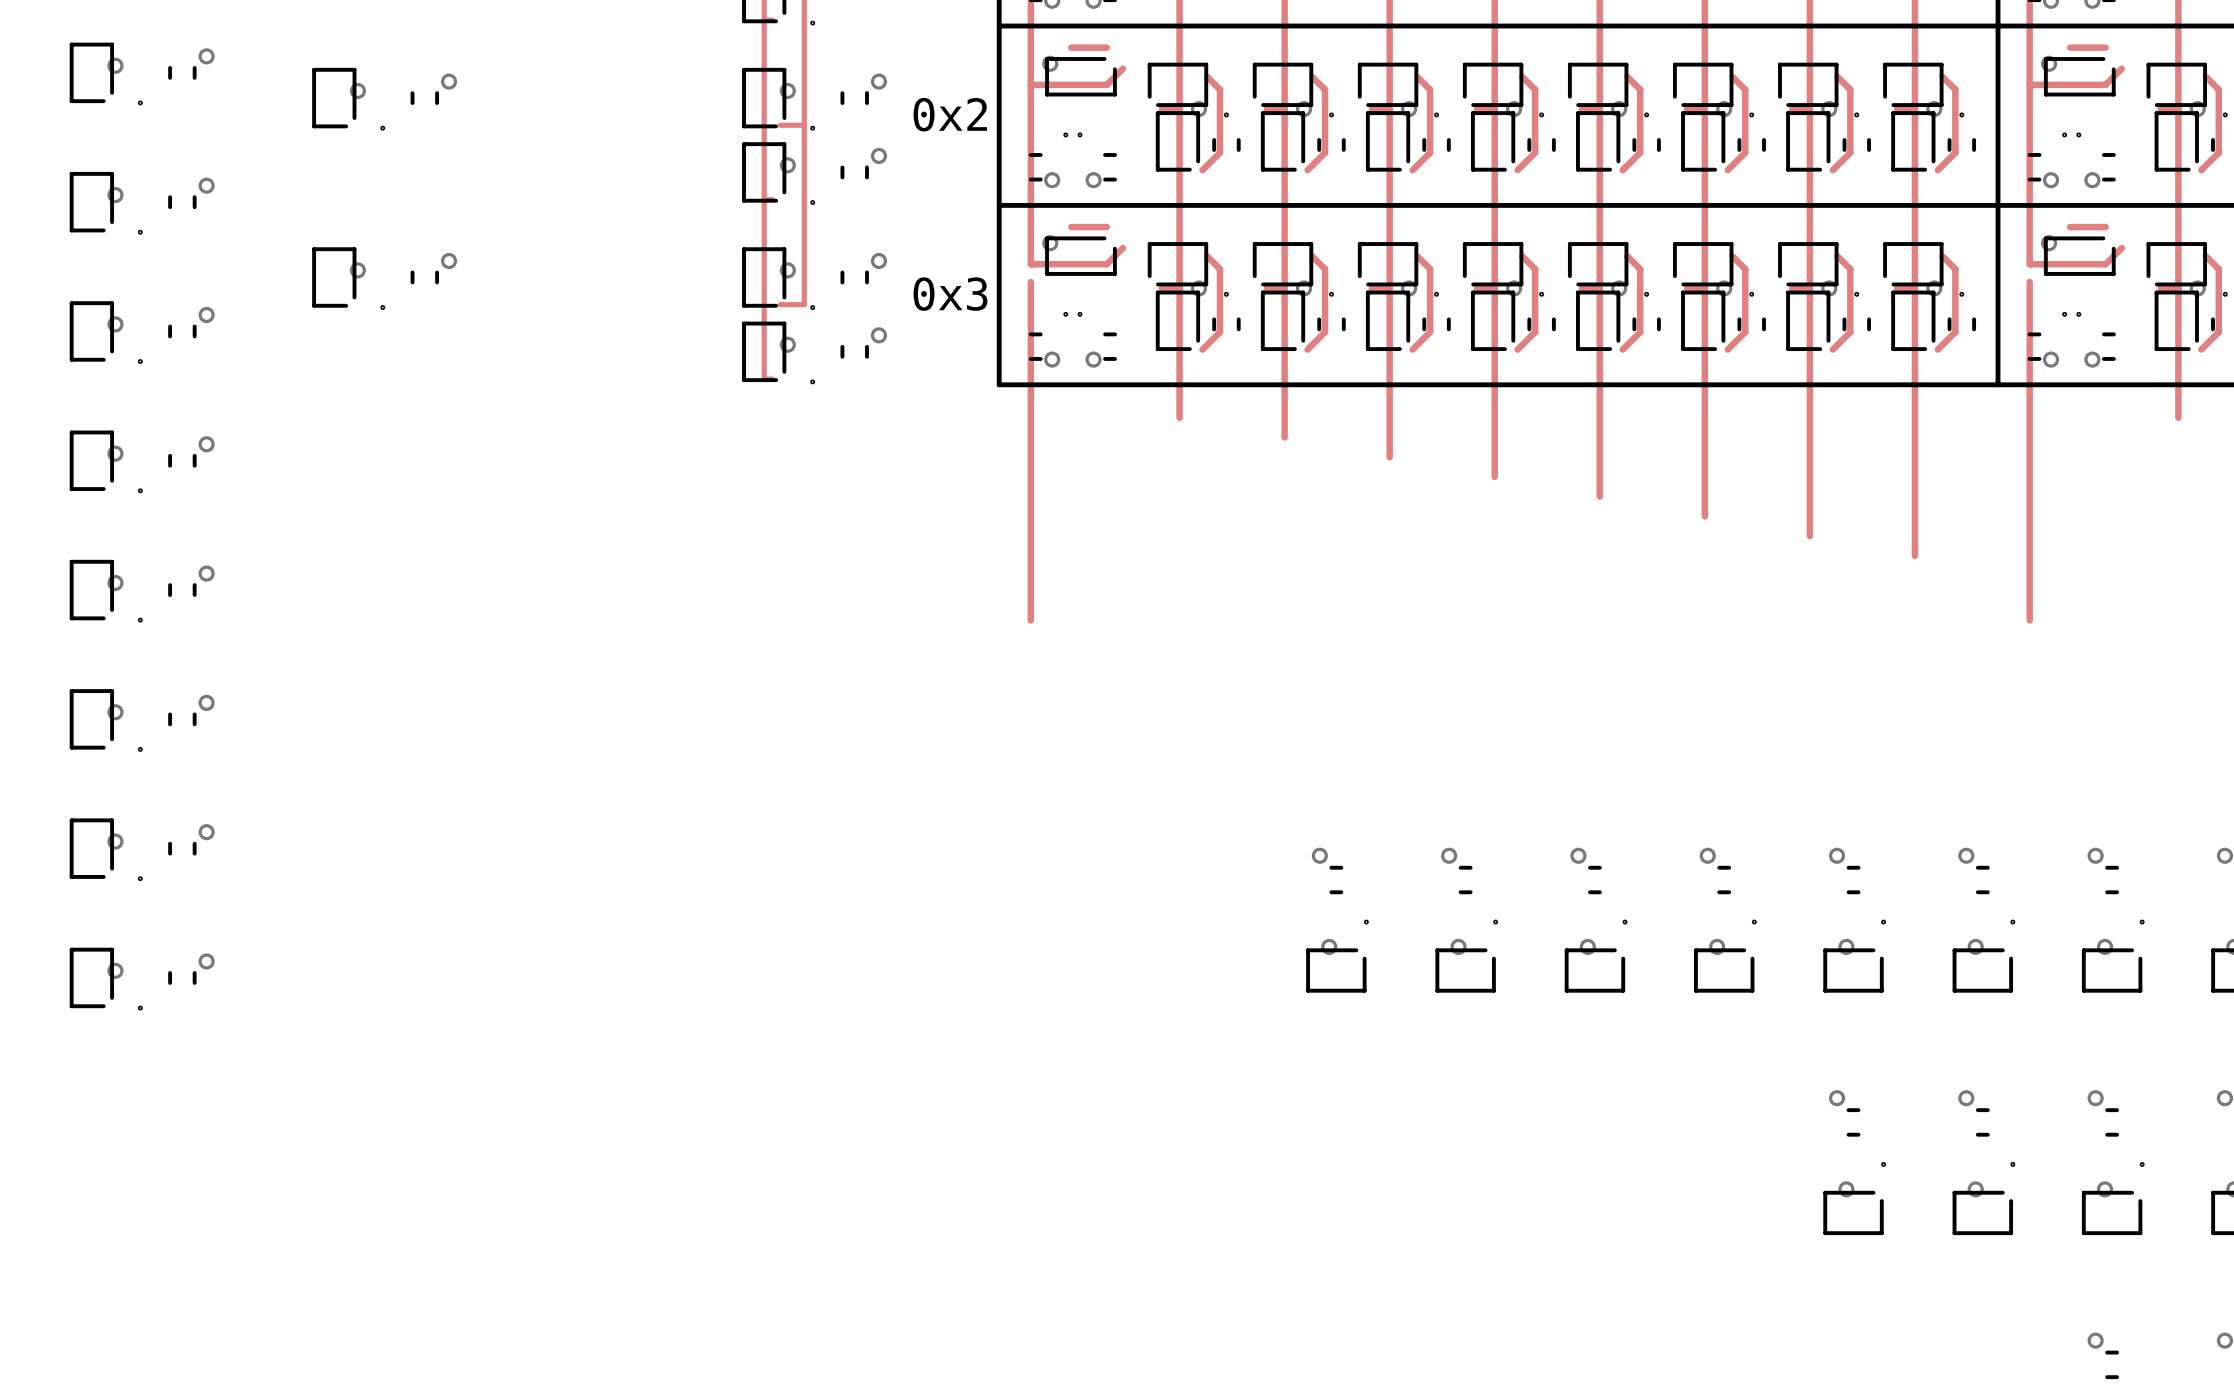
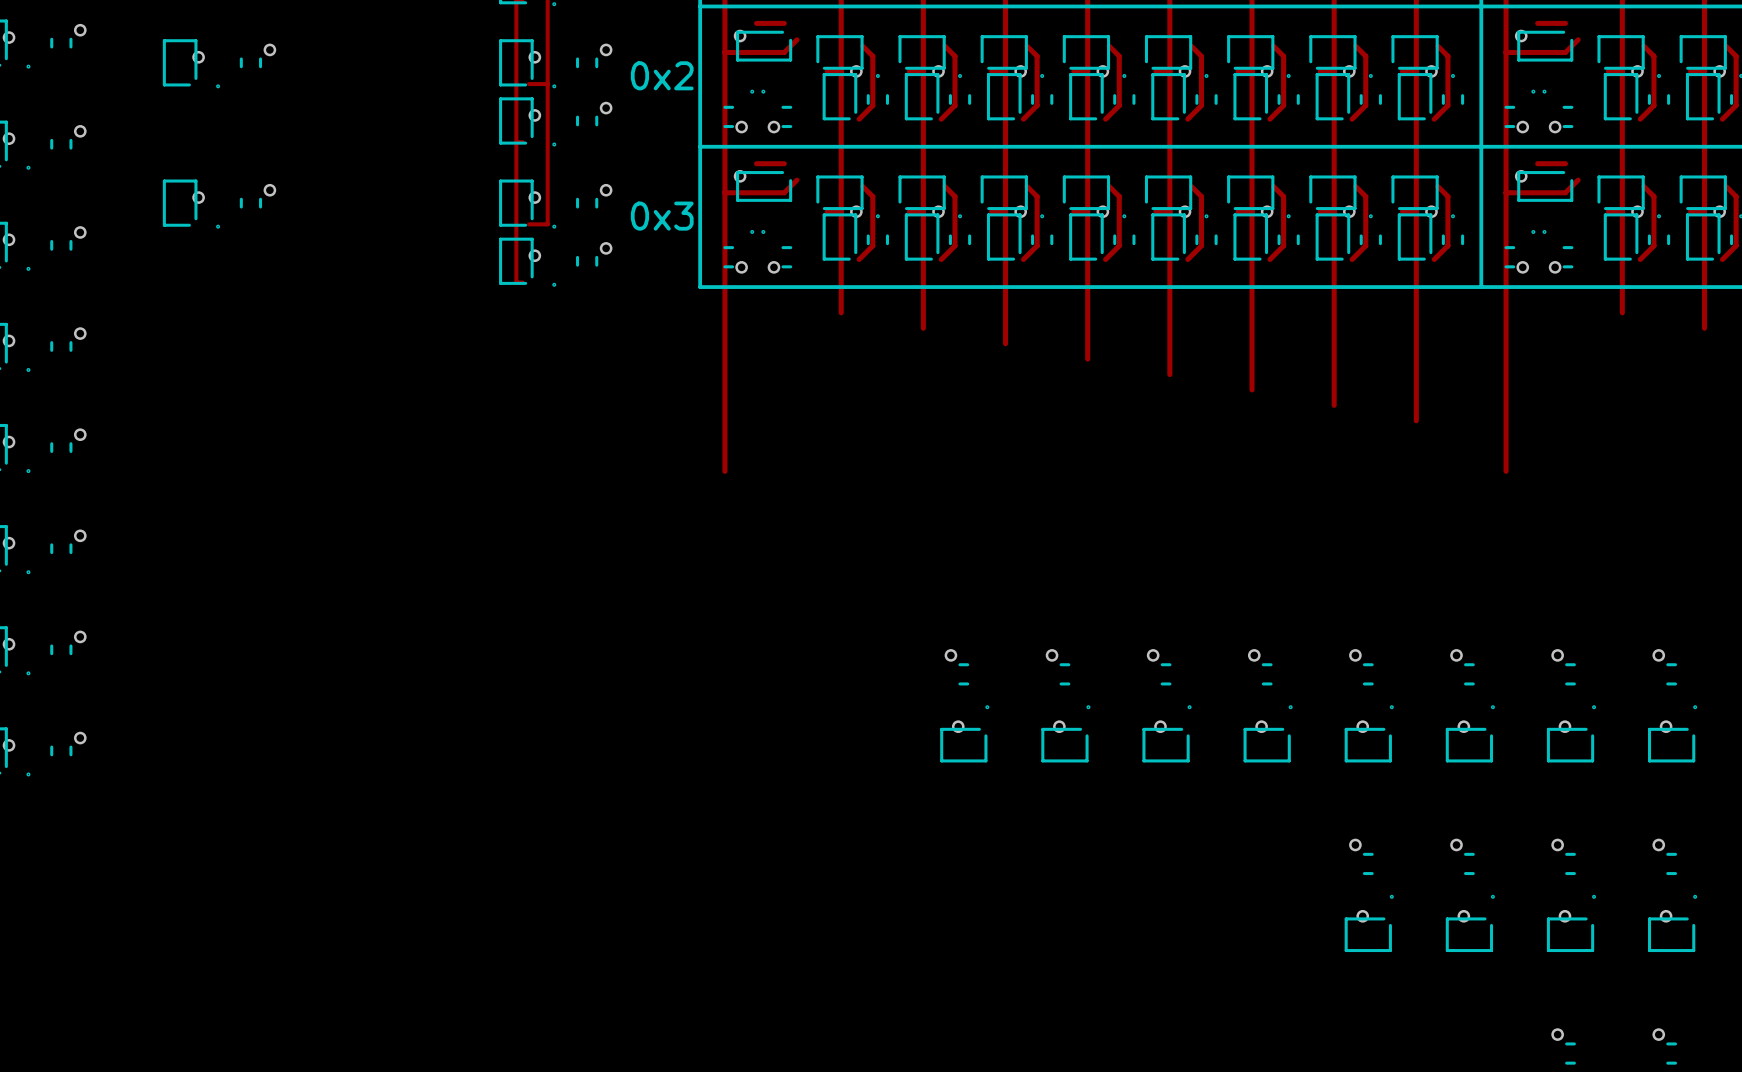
track: none -> (724, 192) (724, 206)
track: none -> (1506, 192) (1506, 206)

